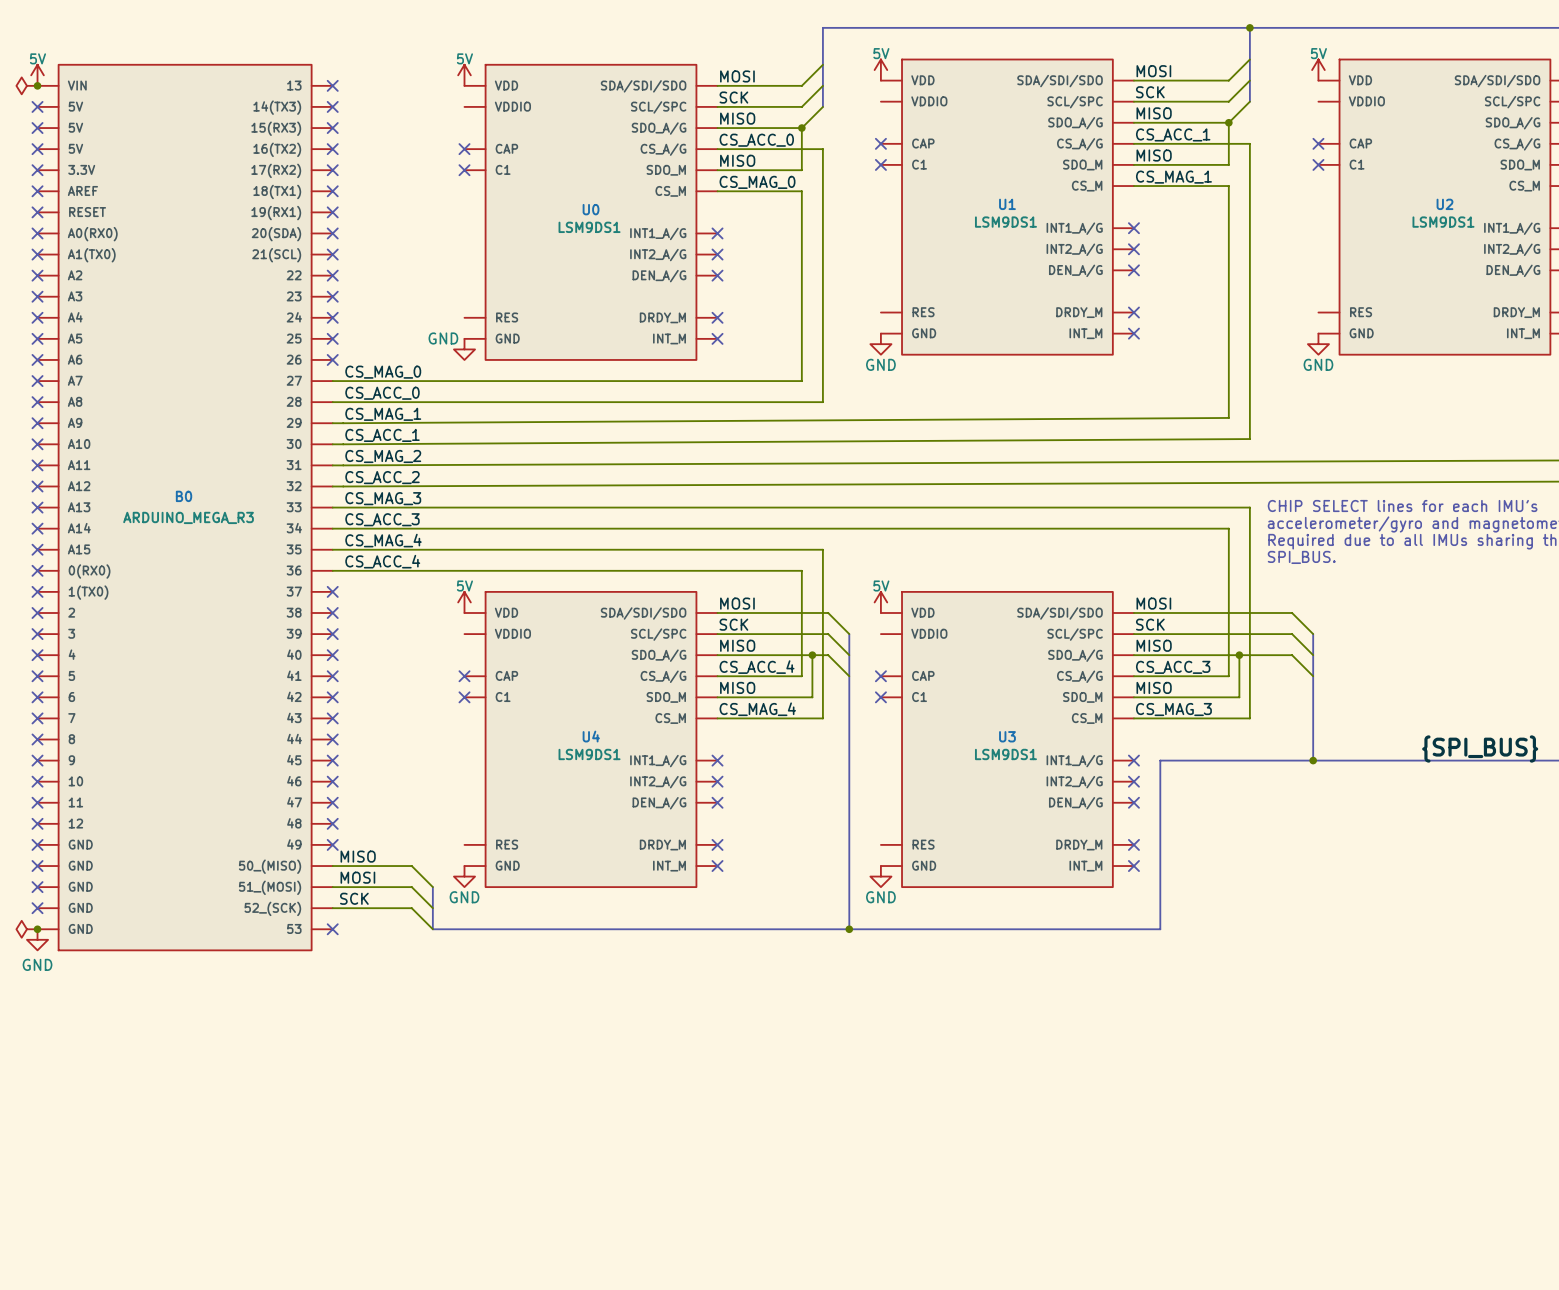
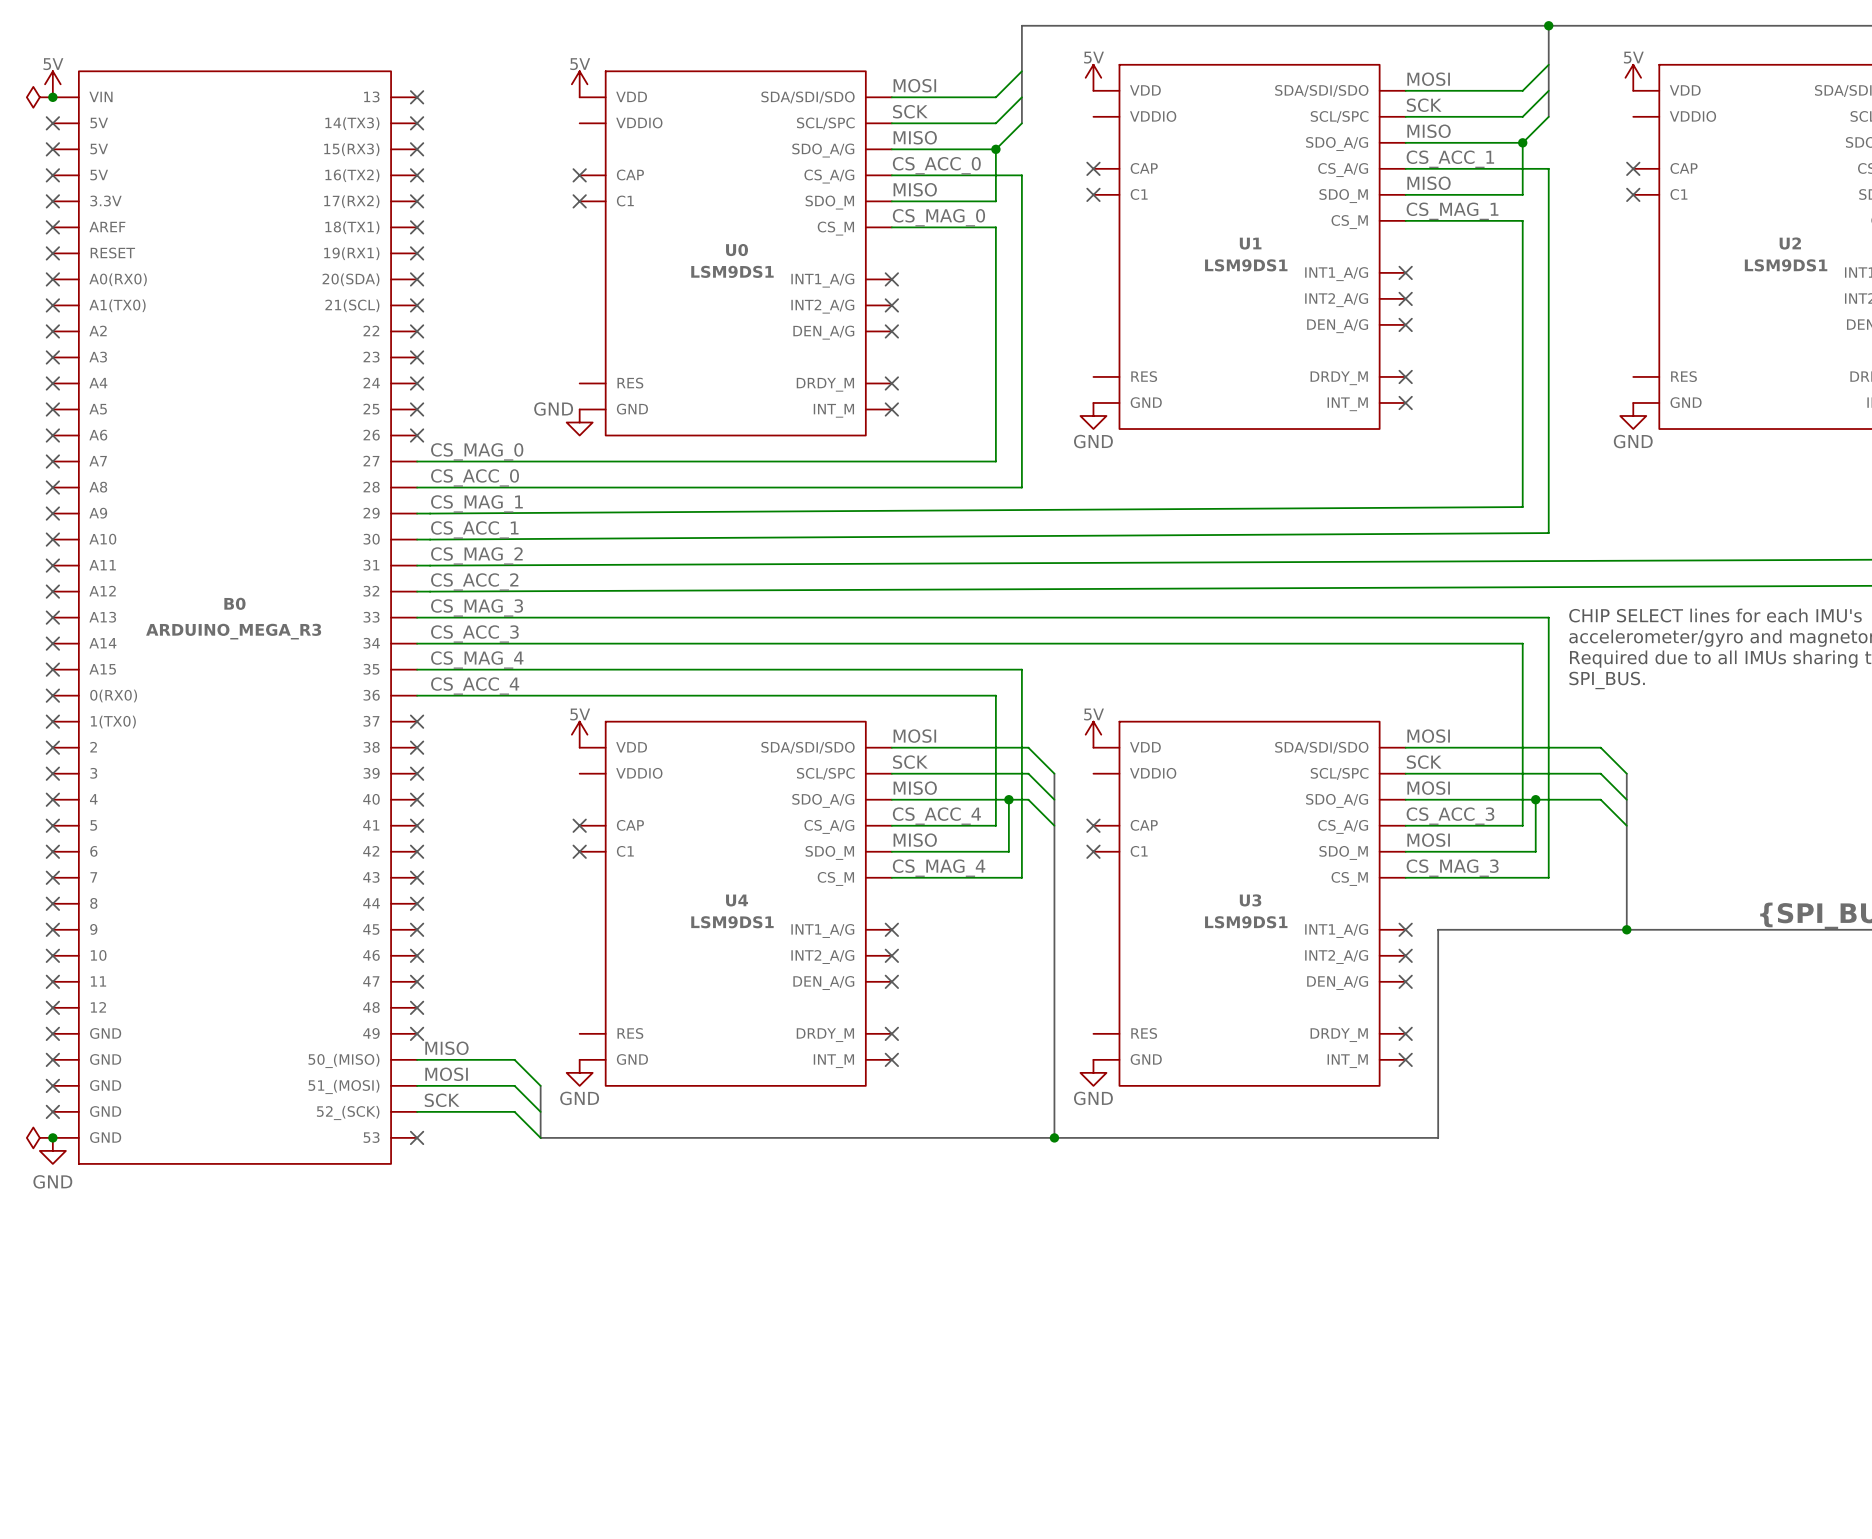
label: MISO (1154, 645) -> MOSI (1428, 788)
label: MISO (1154, 687) -> MOSI (1428, 840)

